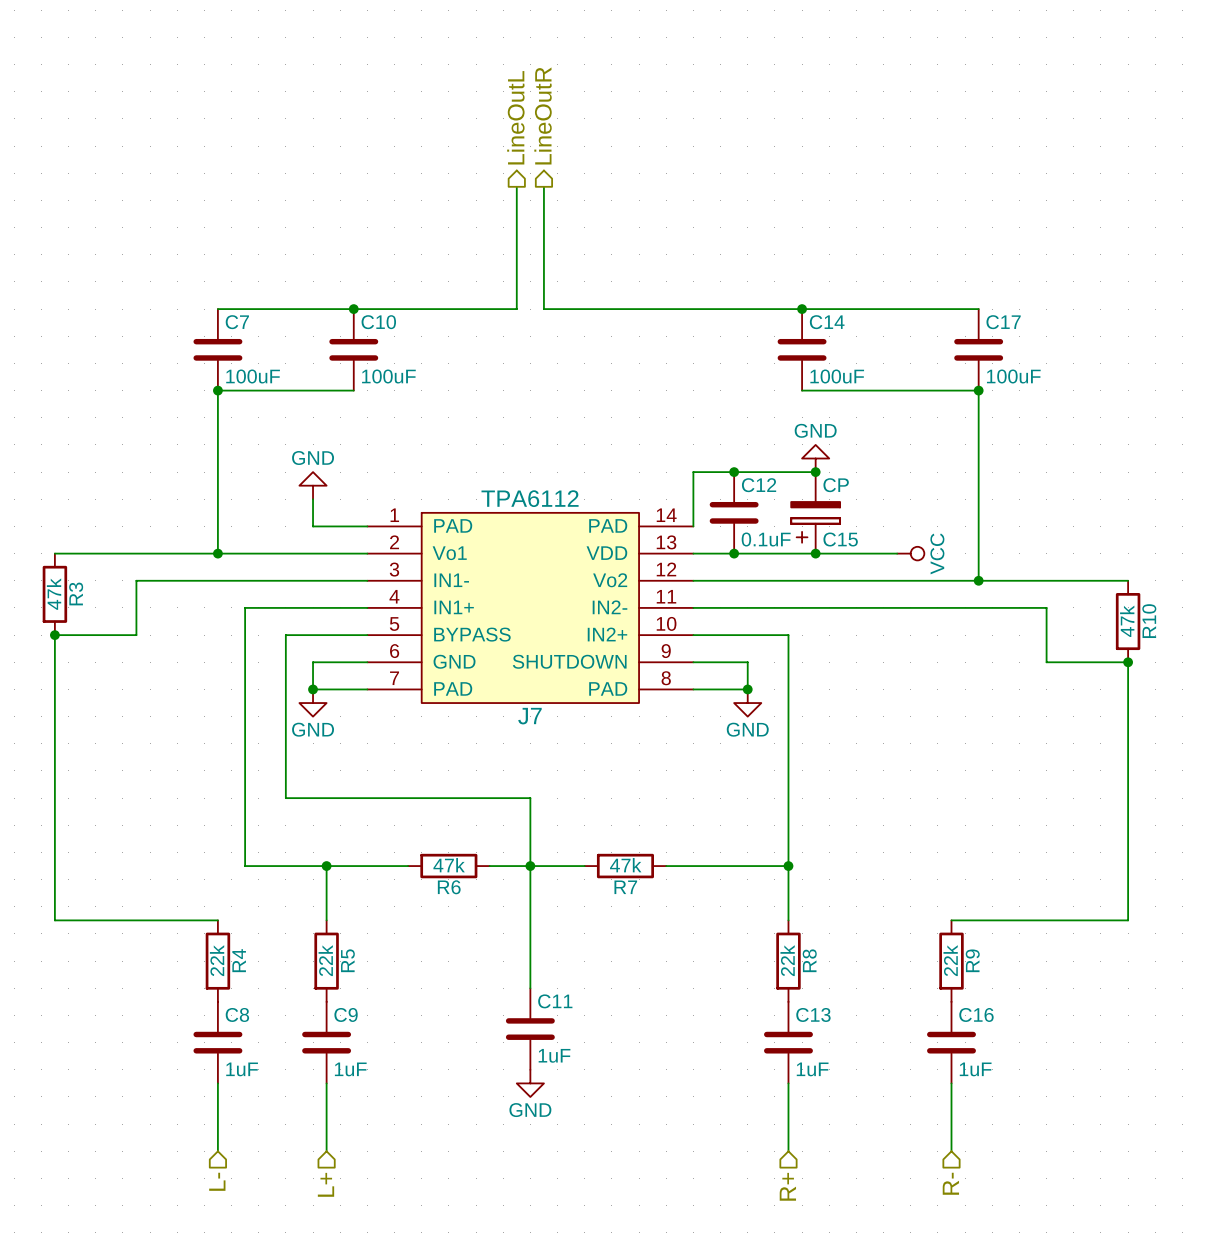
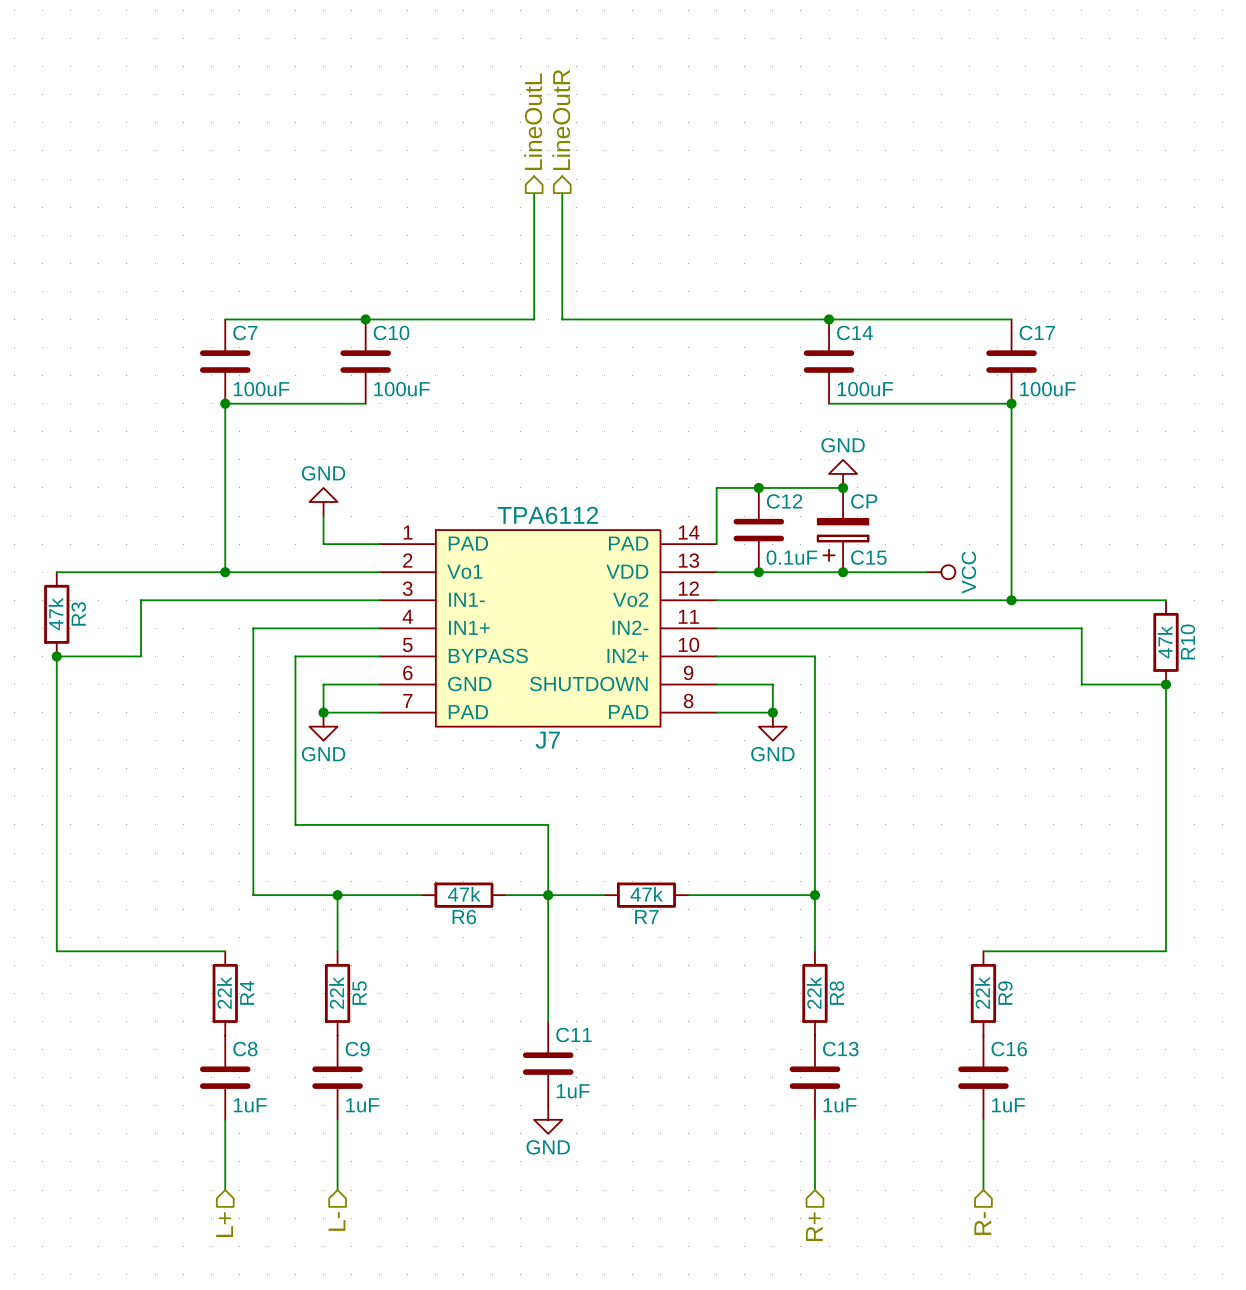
hierarchical label: L- (217, 1181) -> L+ (224, 1224)
hierarchical label: L+ (325, 1184) -> L- (336, 1221)

